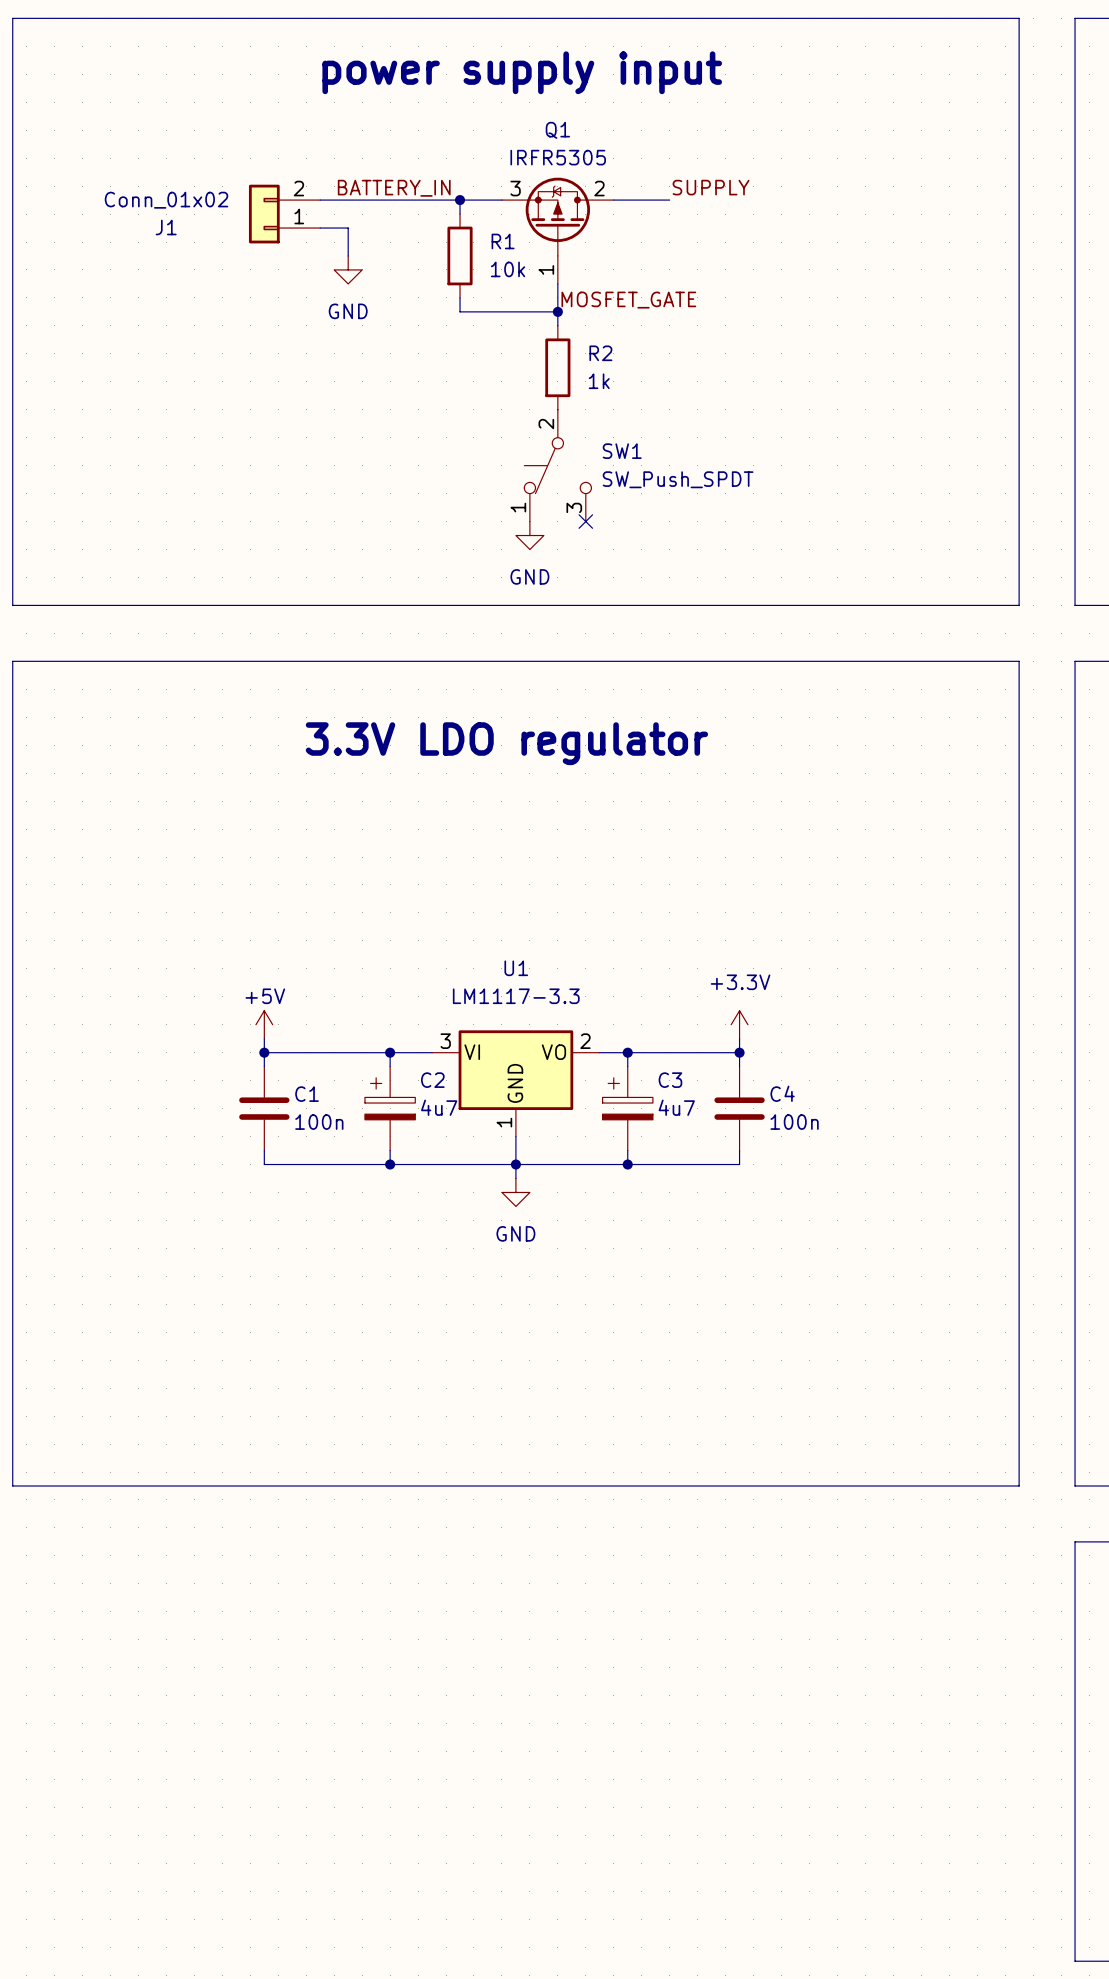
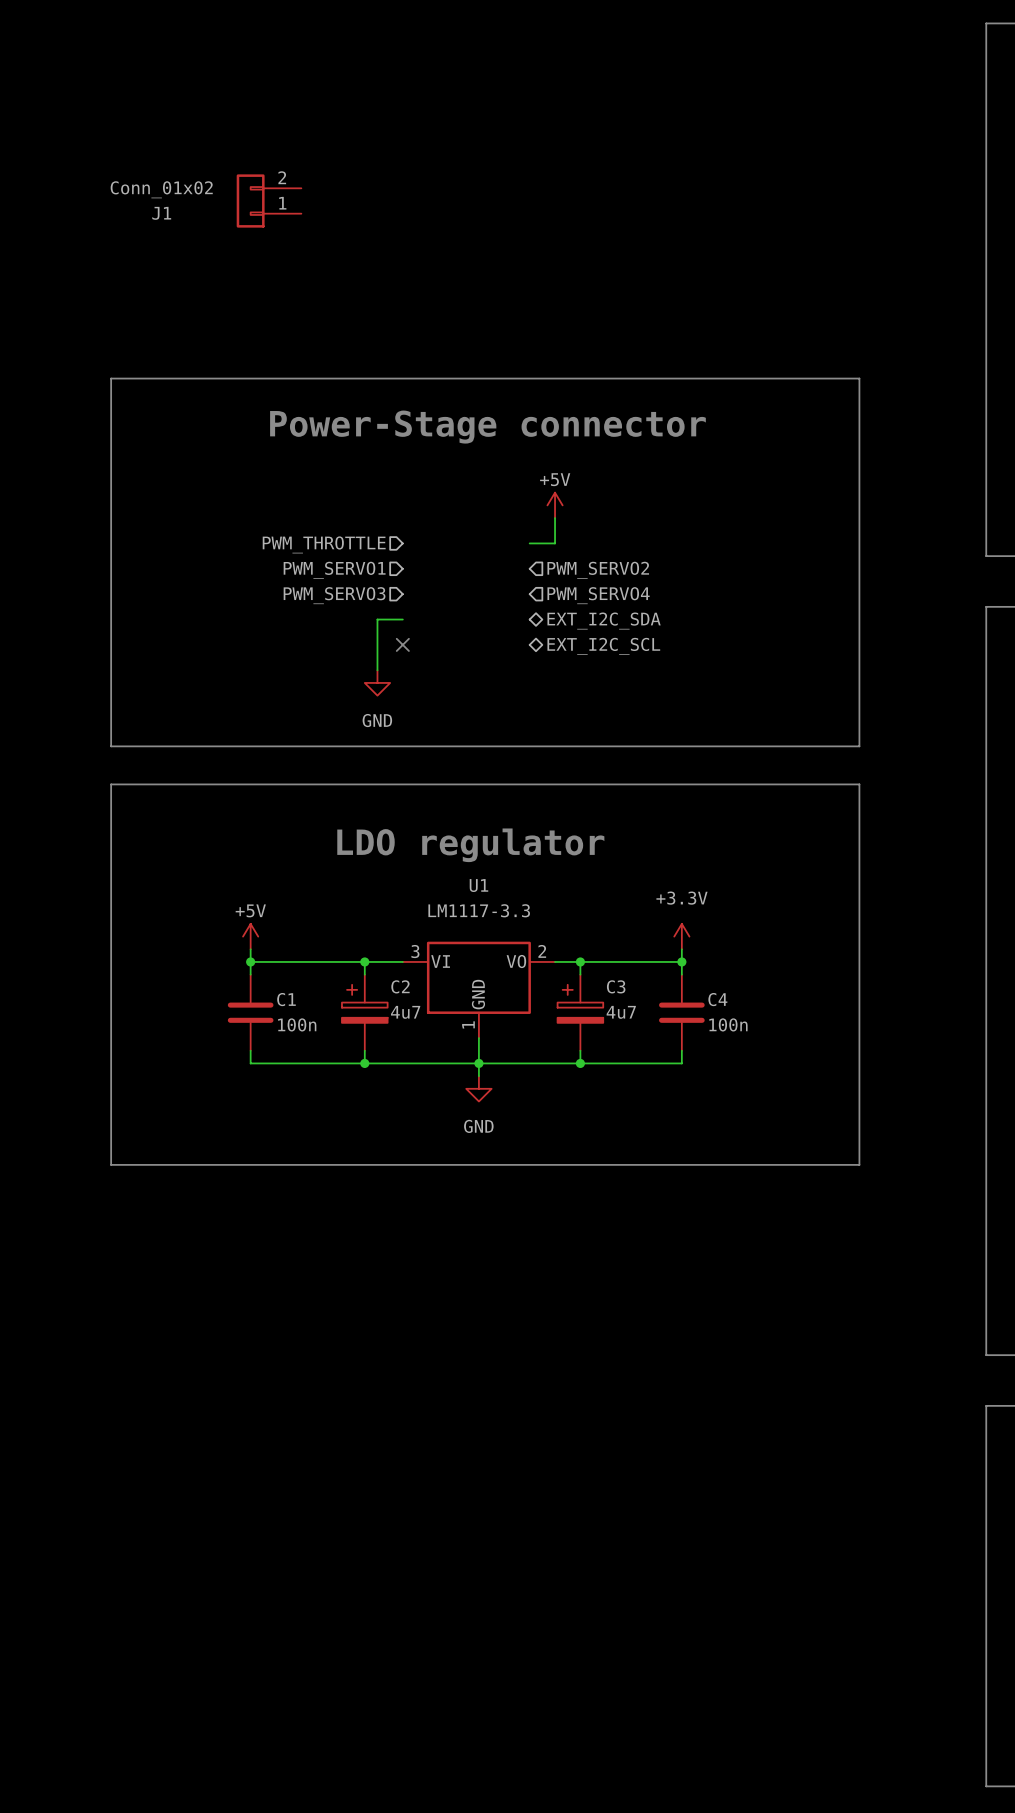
line: (12, 18) (1019, 18) (1019, 605) (12, 605) (12, 18) -> none
text: power supply input (522, 72) -> none
label: SUPPLY (711, 187) -> none
label: BATTERY_IN (394, 188) -> none
wire: (320, 200) (501, 200) -> none
wire: (460, 200) (460, 214) -> none
junction: (460, 200) -> none
wire: (613, 200) (669, 200) -> none
wire: (320, 228) (348, 228) (348, 255) -> none
Q1: IRFR5305 (557, 230) -> none
R1: 10k (460, 255) -> none
power symbol: GND (348, 269) -> none
wire: (557, 283) (557, 325) -> none
wire: (460, 297) (460, 311) (557, 311) -> none
label: MOSFET_GATE (628, 300) -> none
junction: (557, 311) -> none
R2: 1k (557, 367) -> none
line: none -> (111, 378) (111, 746) (859, 746) (859, 378) (111, 378)
text: none -> Power-Stage connector (487, 427)
SW1: SW_Push_SPDT (557, 465) -> none
no-connect mark: (585, 521) -> none
power symbol: GND (529, 535) -> none
power symbol: none -> +5V (555, 505)
wire: none -> (555, 518) (555, 543) (529, 543)
hierarchical label: none -> PWM_THROTTLE (324, 544)
hierarchical label: none -> PWM_SERVO1 (334, 570)
hierarchical label: none -> PWM_SERVO2 (598, 570)
hierarchical label: none -> PWM_SERVO3 (334, 595)
hierarchical label: none -> PWM_SERVO4 (598, 595)
line: (12, 661) (12, 1485) (1019, 1485) (1019, 661) (12, 661) -> none
wire: none -> (402, 619) (377, 619) (377, 670)
hierarchical label: none -> EXT_I2C_SDA (604, 621)
no-connect mark: none -> (402, 644)
hierarchical label: none -> EXT_I2C_SCL (603, 646)
text: 3.3V LDO regulator (506, 743) -> none
power symbol: none -> GND (377, 682)
line: none -> (111, 784) (111, 1164) (859, 1164) (859, 784) (111, 784)
text: none -> LDO regulator (470, 845)

